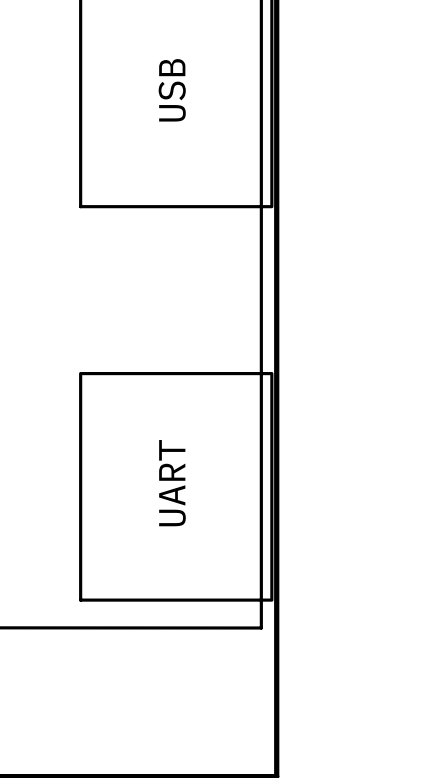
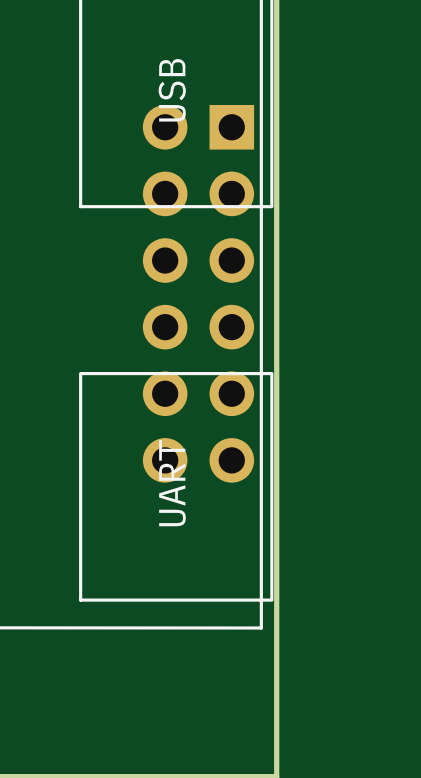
part: none -> (198, 293)

